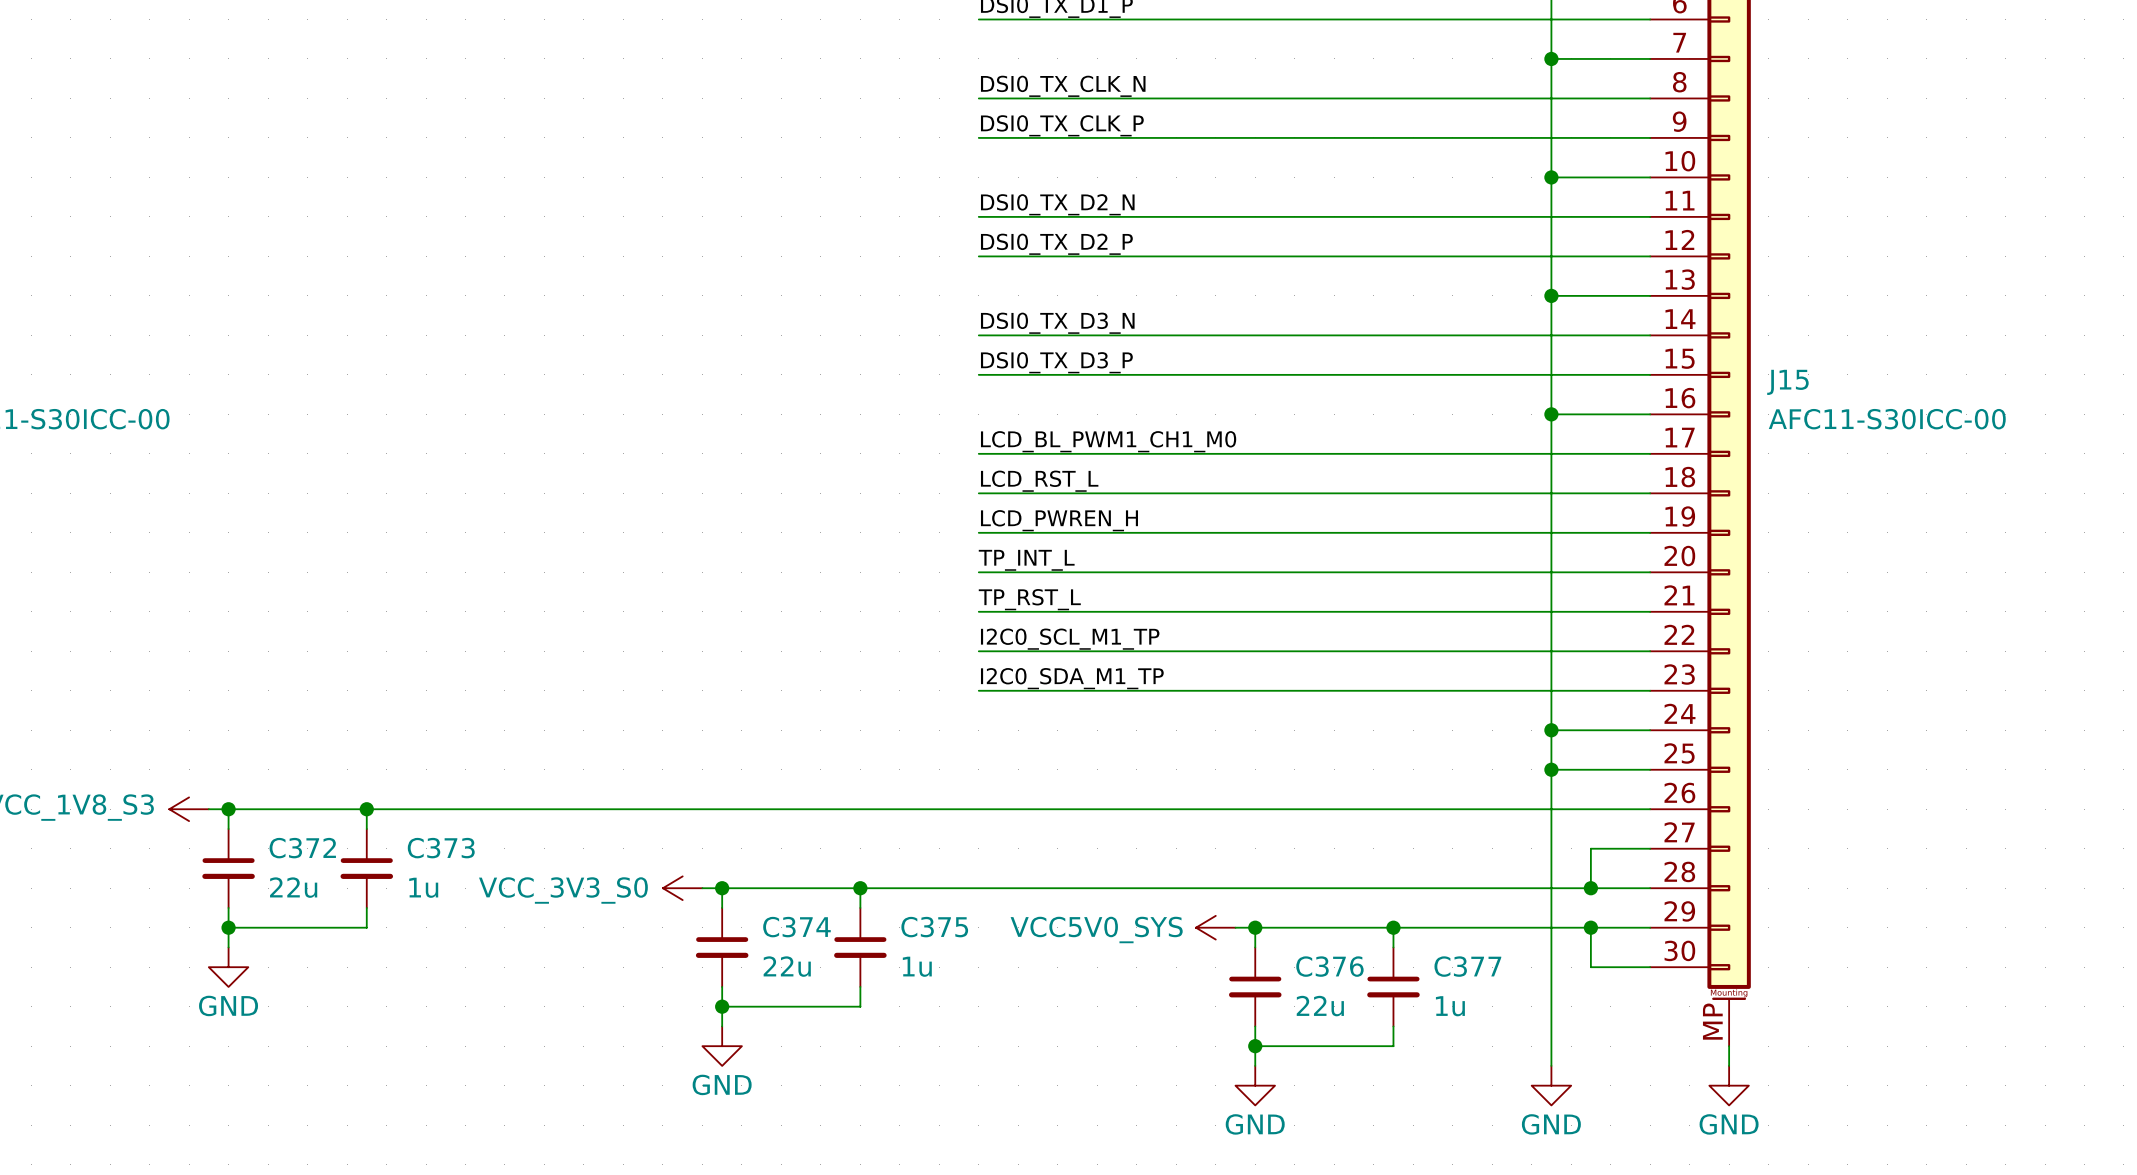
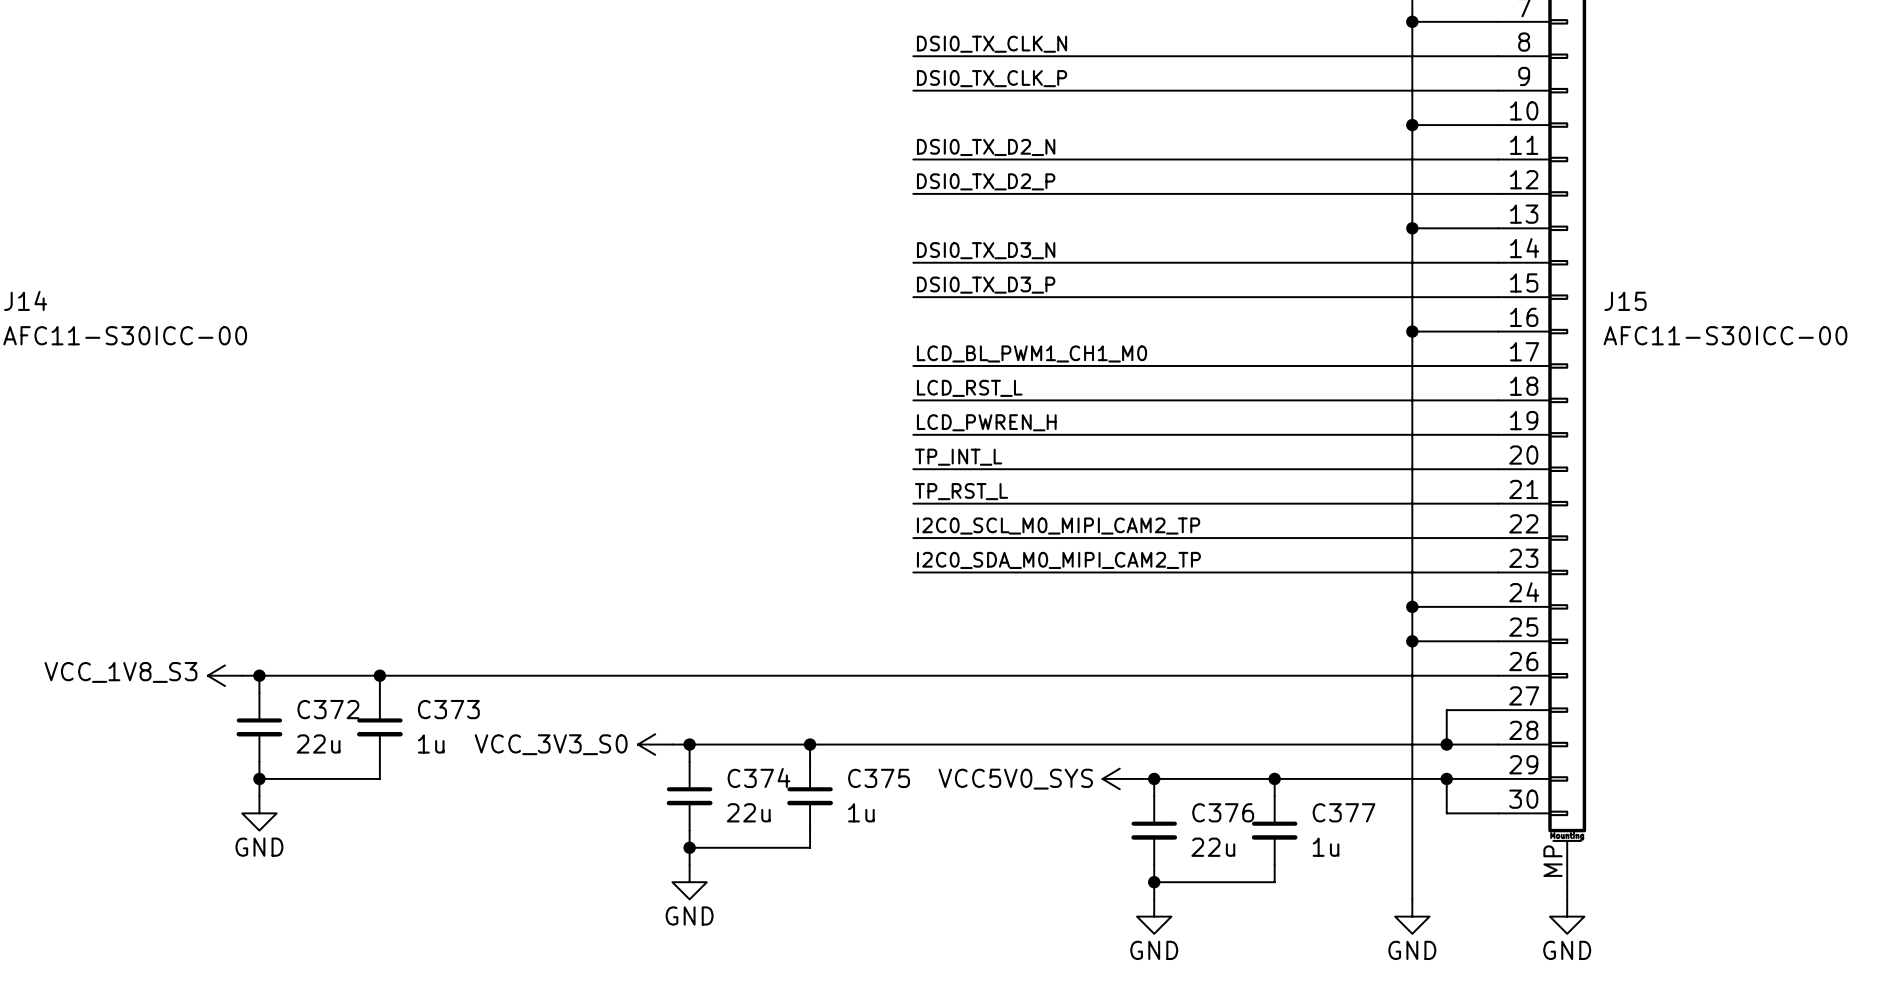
label: I2C0_SCL_M1_TP (1070, 639) -> I2C0_SCL_M0_MIPI_CAM2_TP (1058, 526)
label: I2C0_SDA_M1_TP (1072, 678) -> I2C0_SDA_M0_MIPI_CAM2_TP (1058, 560)

